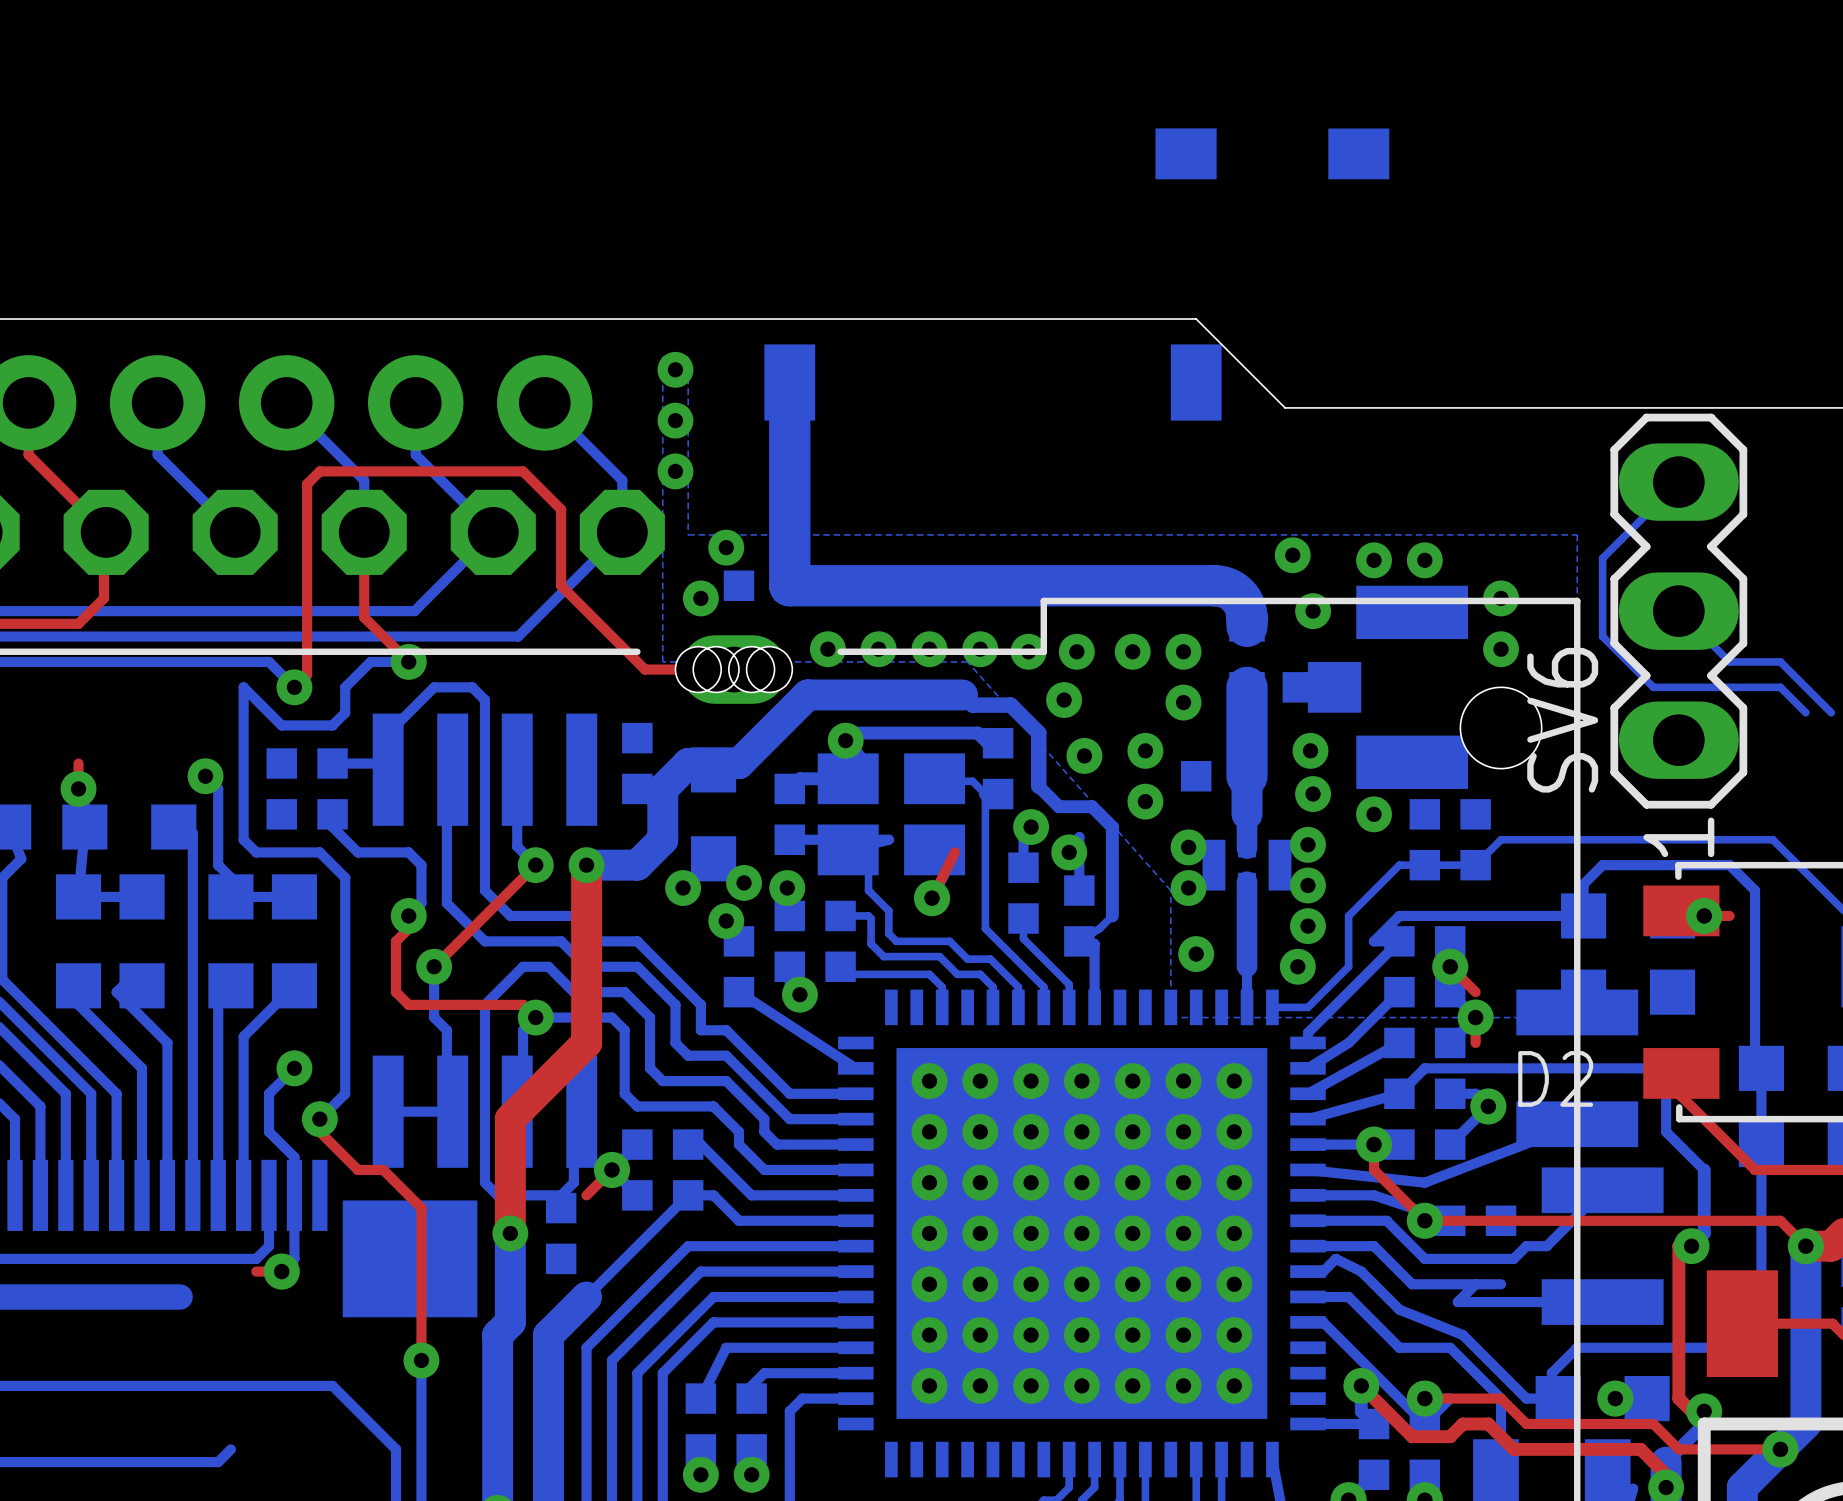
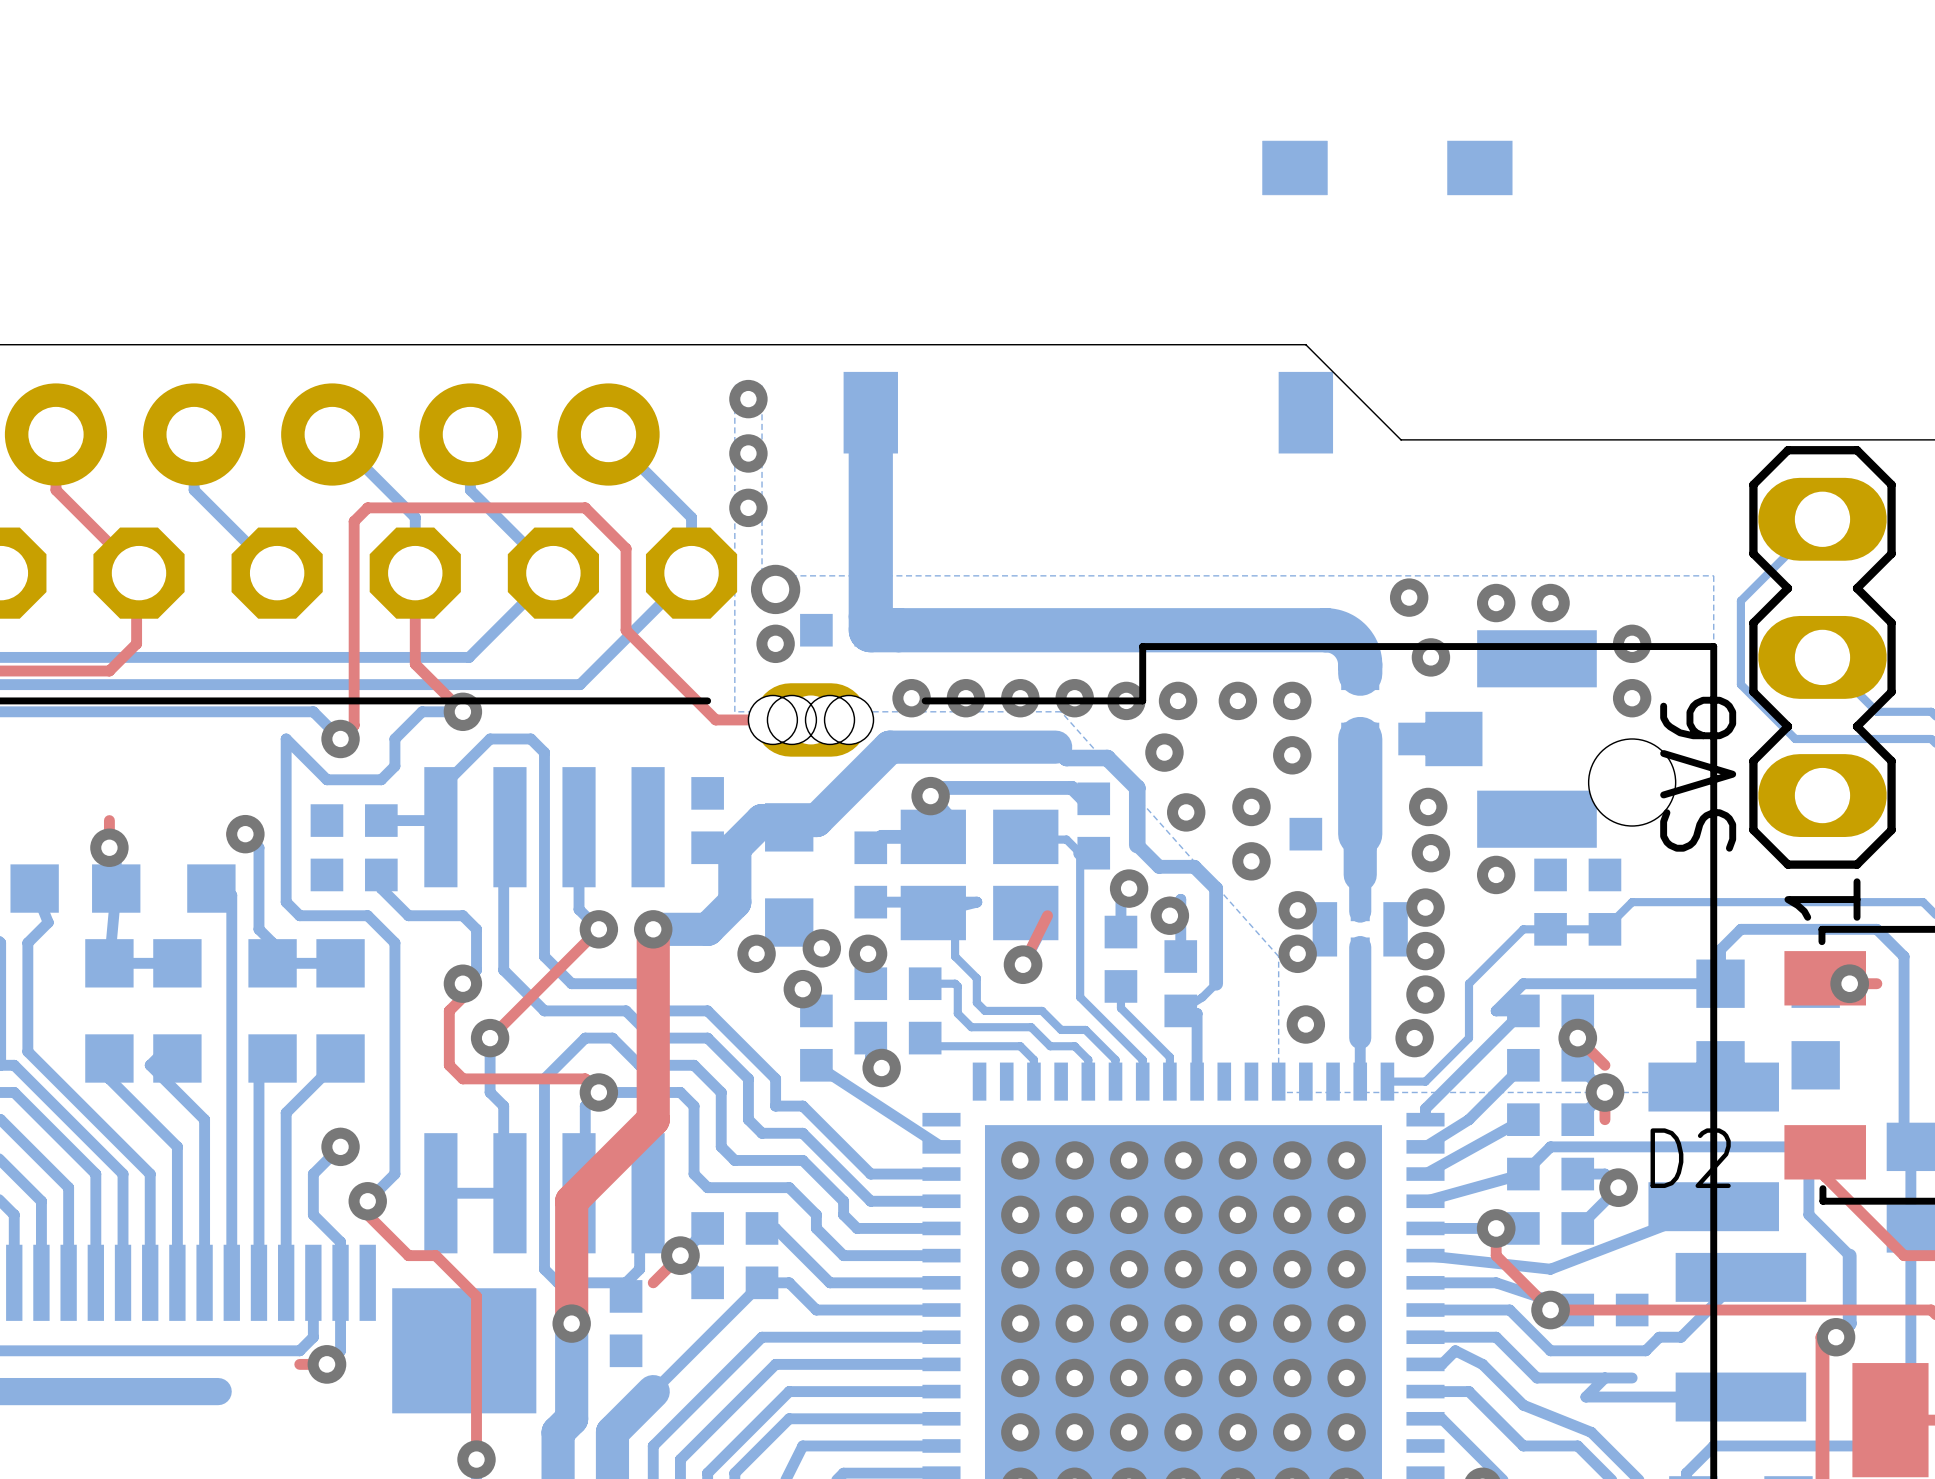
via position: (726, 547) -> (775, 589)

